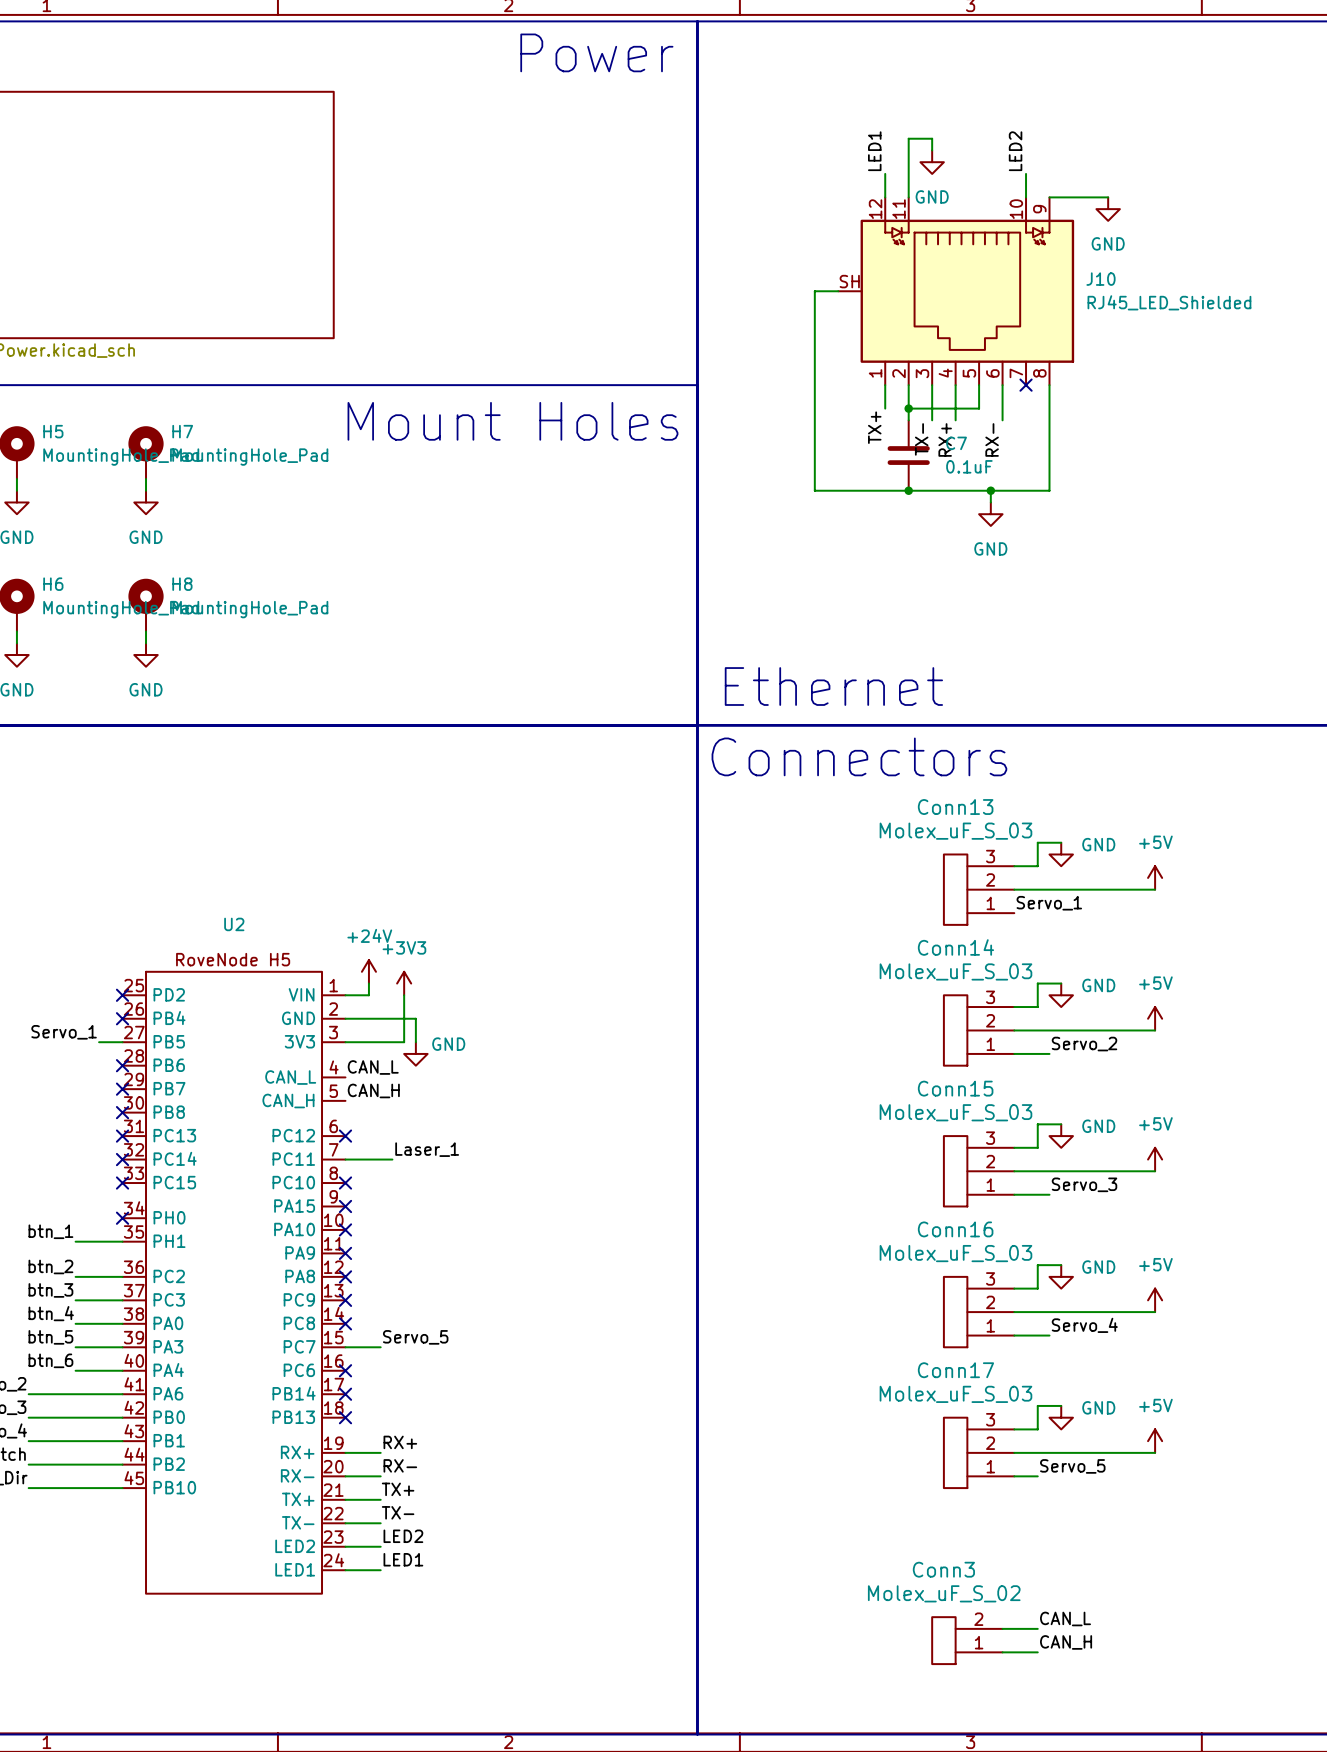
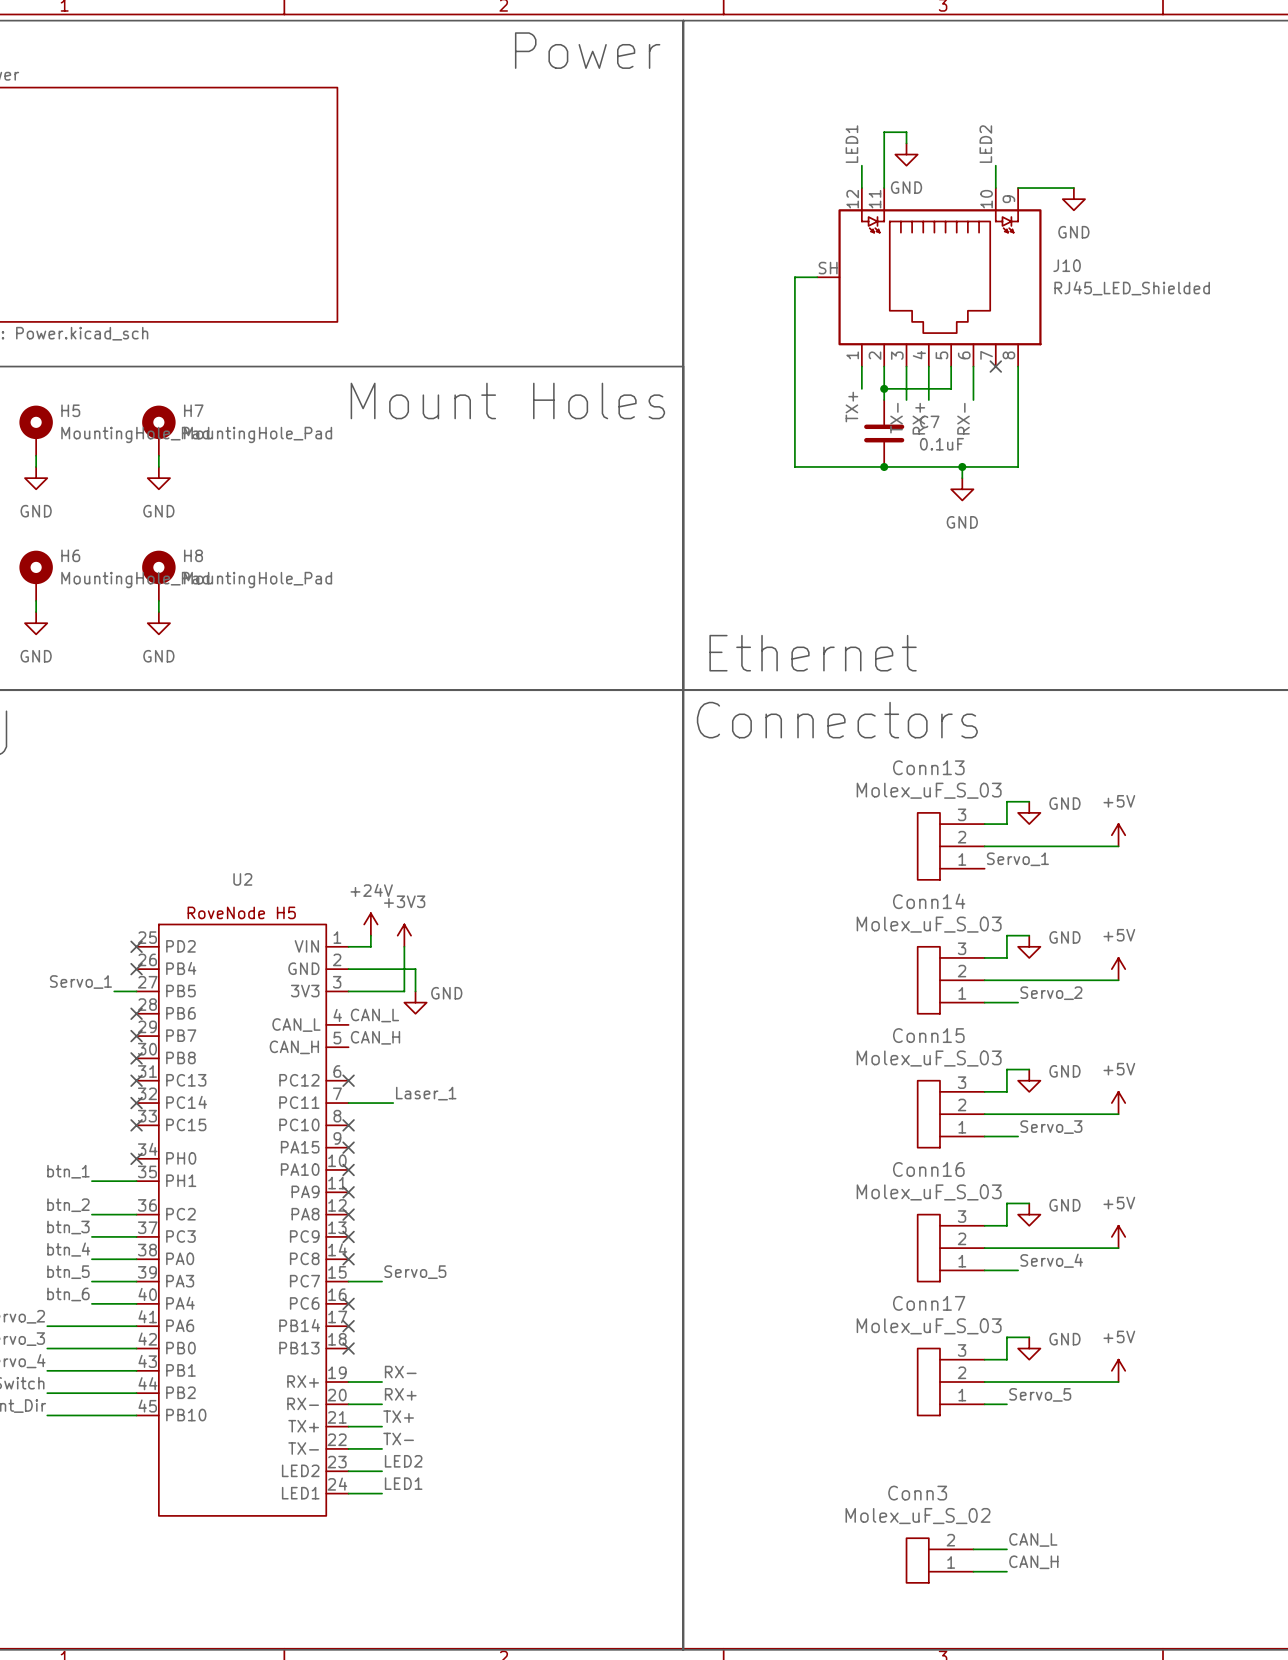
label: RX+ (400, 1442) -> RX- (400, 1372)
label: RX- (400, 1465) -> RX+ (400, 1394)

